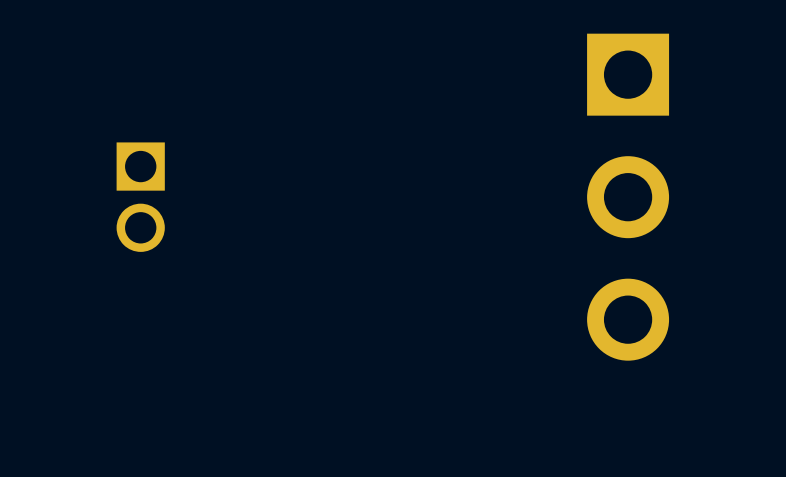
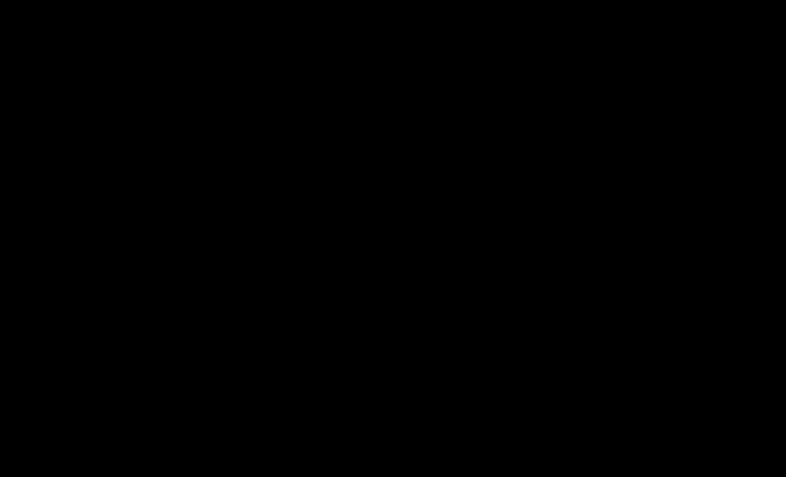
part: (140, 197) -> none
part: (628, 197) -> none

